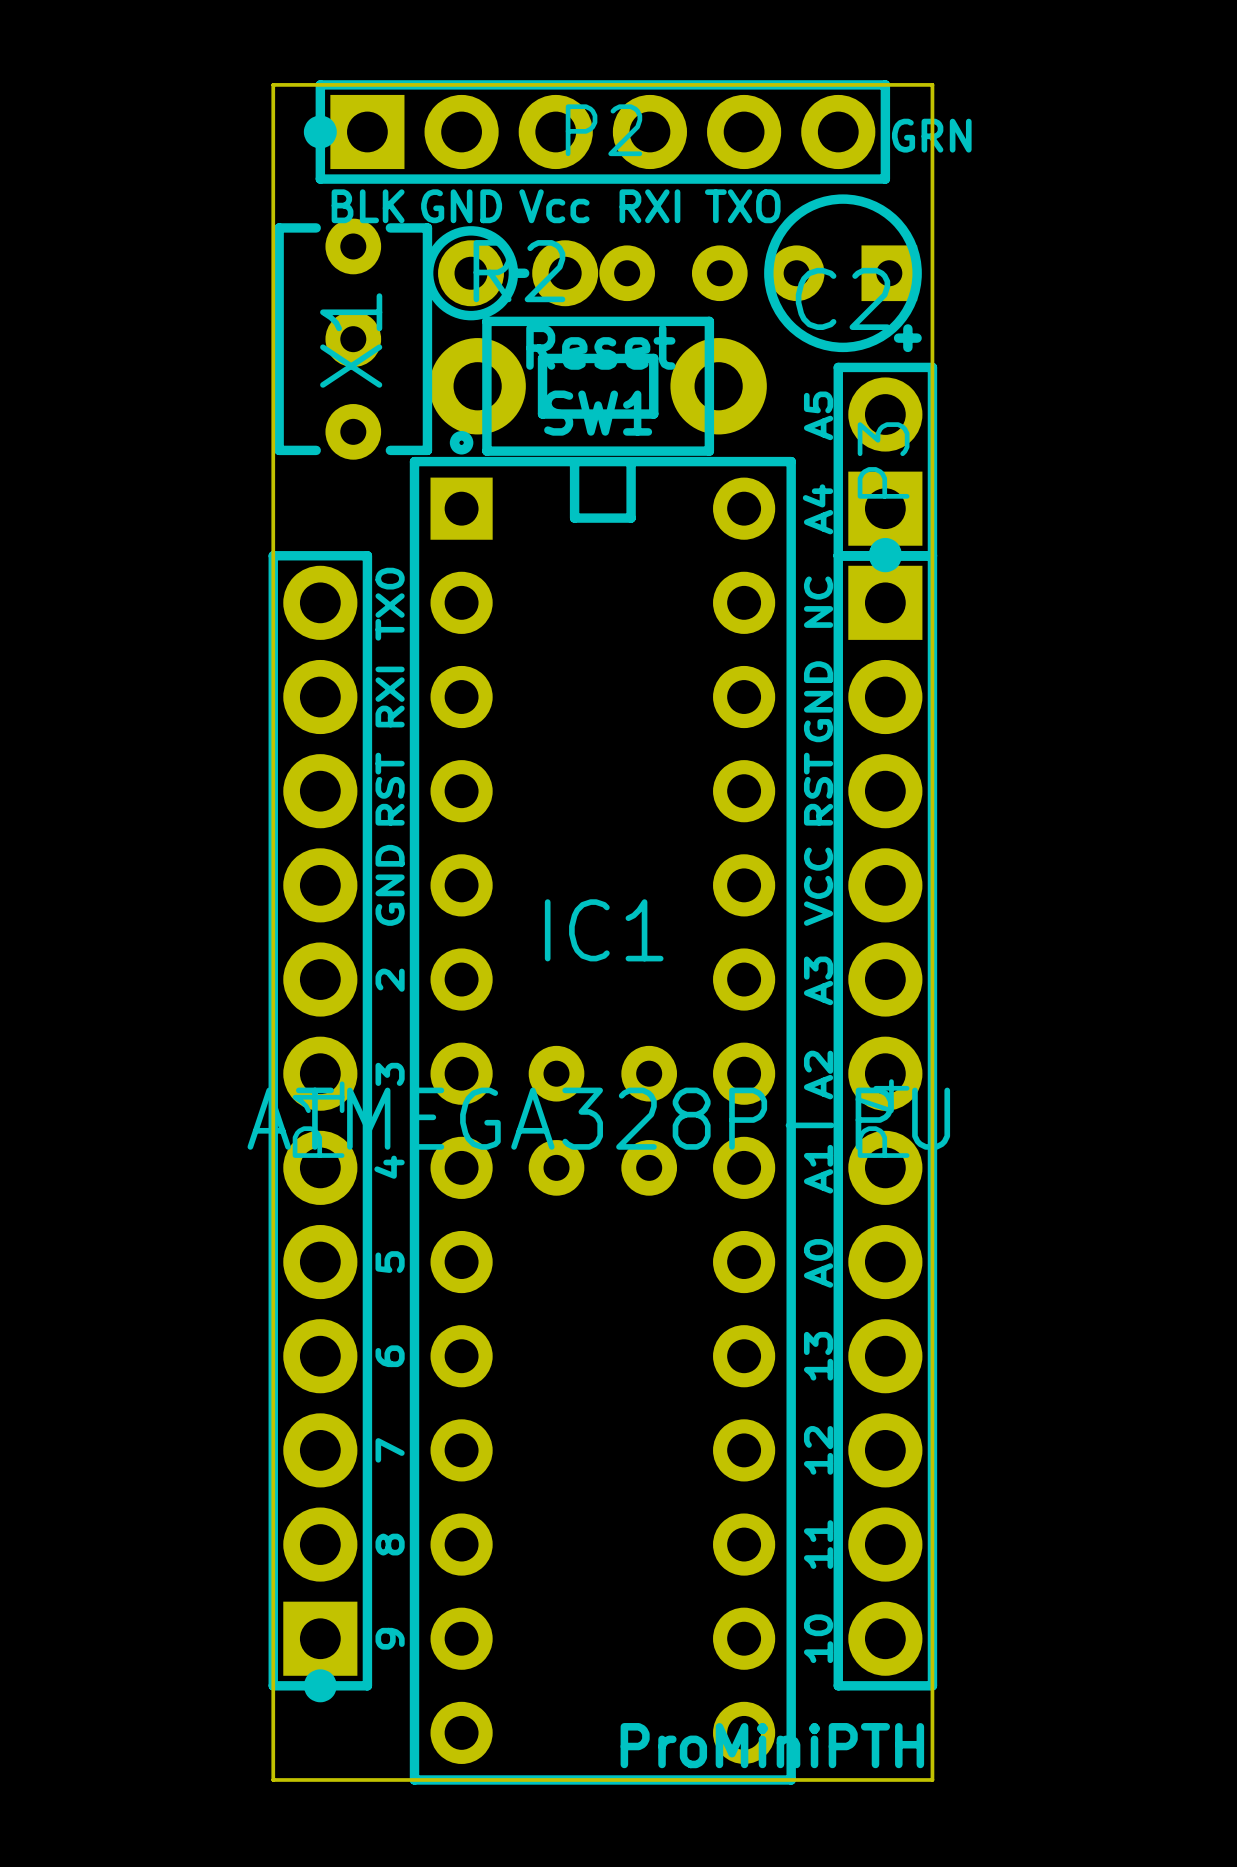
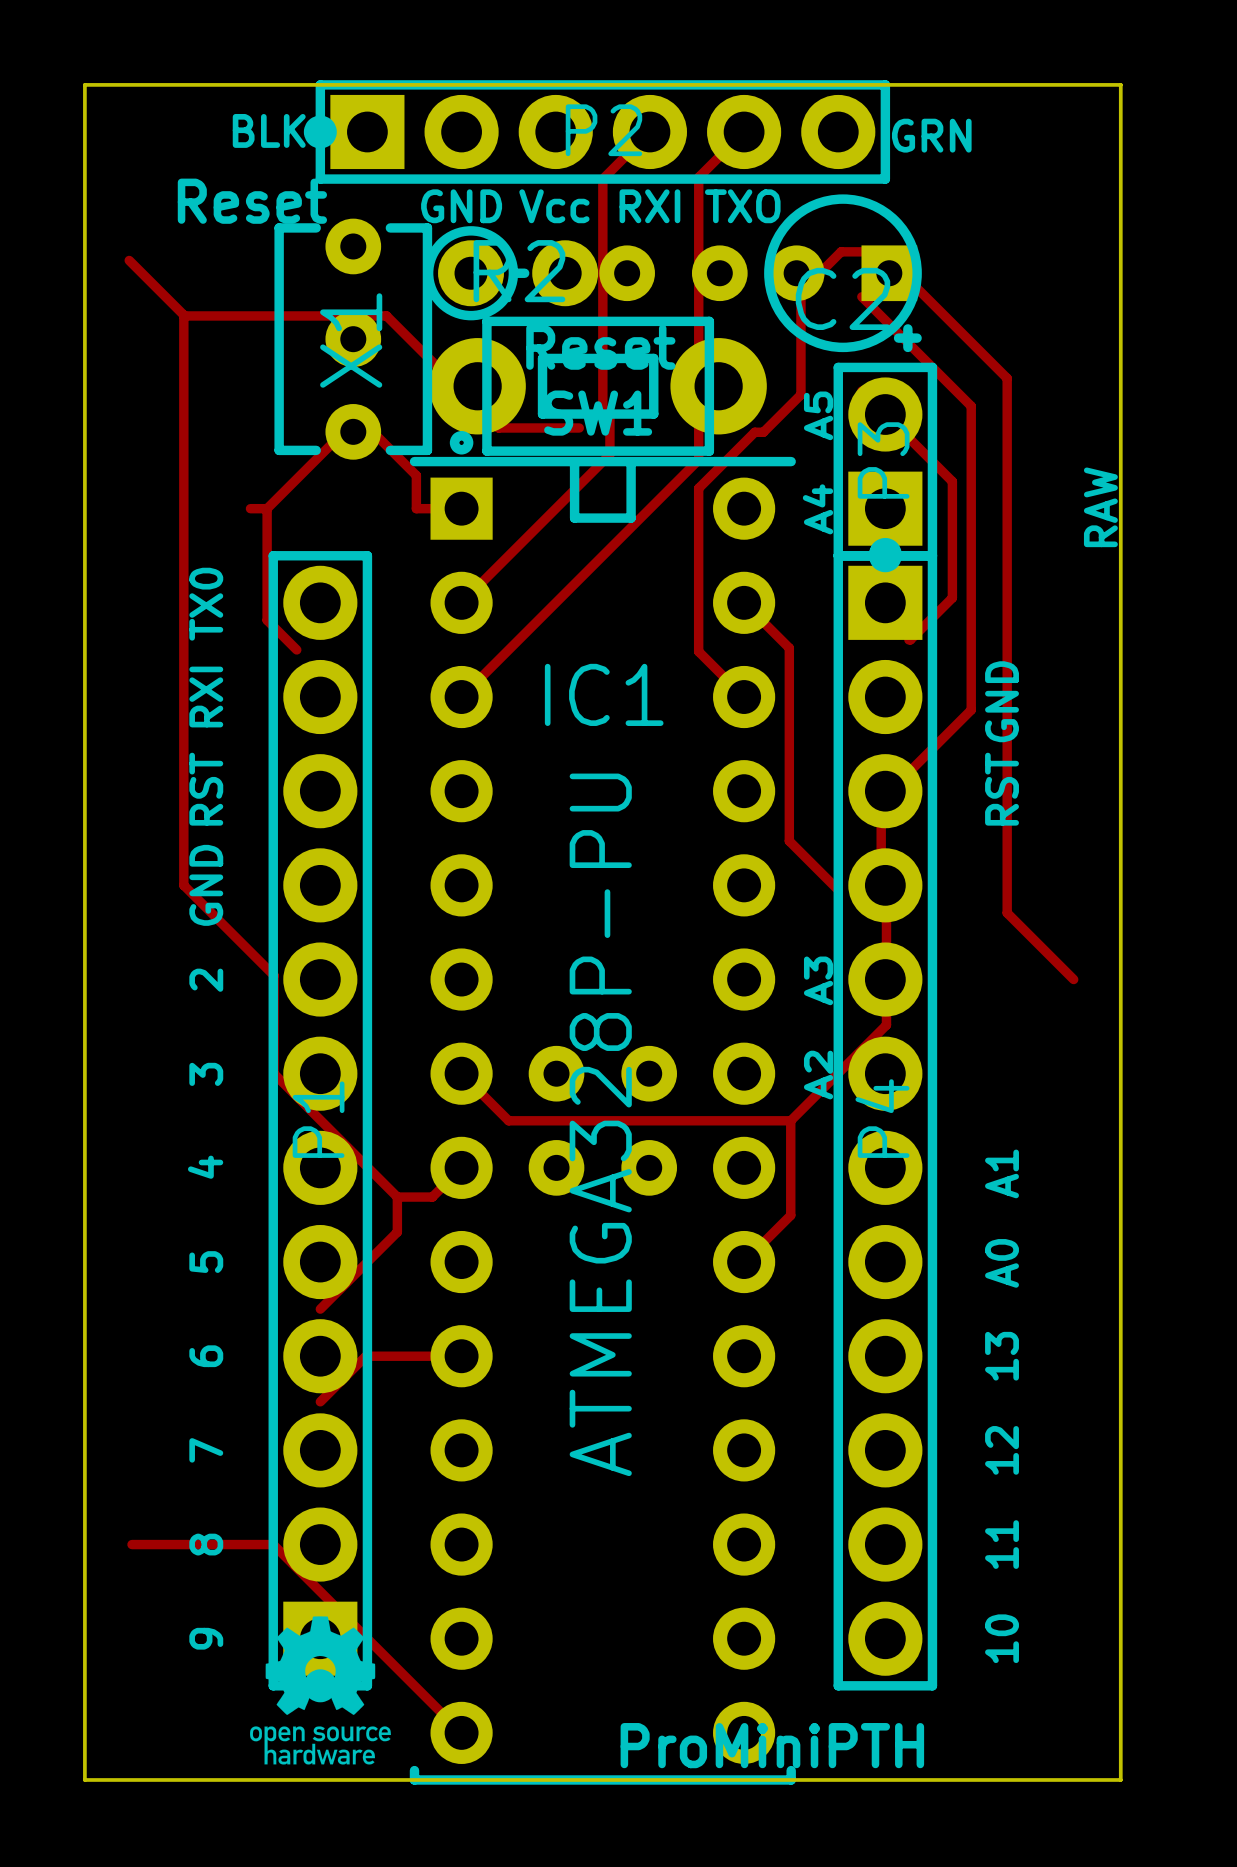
board edge: (273, 84) (273, 1779) -> (273, 84) (84, 84) (84, 1779) (273, 1779)
board edge: (932, 84) (932, 1779) -> (932, 84) (1120, 84) (1120, 1779) (932, 1779)
track: none -> (649, 131) (602, 179) (602, 408) (609, 415) (609, 454) (461, 602)
track: none -> (744, 131) (698, 177) (698, 459) (461, 697)
text: none -> Reset (252, 201)
text position: BLK (368, 206) -> BLK (269, 130)
track: none -> (129, 260) (183, 315) (183, 885) (274, 975) (274, 1073) (397, 1197)
track: none -> (861, 296) (971, 406) (971, 710) (881, 800) (881, 866) (886, 871) (886, 1025) (790, 1120)
track: none -> (183, 315) (386, 315) (498, 427) (579, 427)
track: none -> (861, 390) (952, 481) (952, 597) (908, 639)
track: none -> (370, 429) (416, 475) (416, 508) (461, 508)
track: none -> (370, 429) (346, 429) (267, 508)
IC1 footprint: [409, 430, 796, 1785] -> [409, 430, 796, 1785]
text: none -> RAW (1100, 507)
track: none -> (250, 508) (267, 508)
track: none -> (267, 508) (267, 620) (296, 649)
track: none -> (744, 602) (789, 648) (789, 841) (838, 890)
text: NC (818, 602) -> none
text position: TX0 (390, 604) -> TX0 (206, 604)
text position: RXI (390, 697) -> RXI (206, 697)
track: none -> (744, 697) (698, 651) (698, 488) (754, 432) (763, 432) (800, 394) (800, 292) (841, 251) (880, 251) (1007, 378) (1007, 913) (1073, 979)
text position: GND (818, 701) -> GND (1002, 701)
text position: RST (390, 789) -> RST (206, 789)
text position: RST (818, 789) -> RST (1002, 789)
text position: GND (390, 885) -> GND (206, 885)
text: VCC (818, 886) -> none
IC1 name position: IC1 (604, 930) -> IC1 (604, 694)
text position: 2 (390, 980) -> 2 (206, 980)
track: none -> (461, 1073) (508, 1120) (790, 1120)
text position: 3 (390, 1074) -> 3 (206, 1074)
track: none -> (790, 1120) (790, 1215) (744, 1262)
text position: 4 (389, 1167) -> 4 (205, 1167)
track: none -> (461, 1167) (432, 1197) (397, 1197)
text position: A1 (818, 1169) -> A1 (1002, 1173)
track: none -> (397, 1197) (397, 1232) (320, 1309)
text position: 5 (390, 1262) -> 5 (206, 1262)
text position: A0 (818, 1263) -> A0 (1002, 1263)
text position: 6 (390, 1356) -> 6 (206, 1356)
track: none -> (461, 1356) (365, 1356) (320, 1401)
text position: 13 (818, 1356) -> 13 (1002, 1356)
text position: 7 (390, 1450) -> 7 (206, 1450)
text position: 12 (818, 1450) -> 12 (1002, 1450)
track: none -> (131, 1544) (273, 1544) (461, 1732)
text position: 8 (390, 1544) -> 8 (206, 1544)
text position: 11 (818, 1544) -> 11 (1002, 1544)
drawing: none -> [250, 1616, 392, 1765]
text position: 9 (390, 1638) -> 9 (206, 1638)
text position: 10 (818, 1638) -> 10 (1002, 1638)

